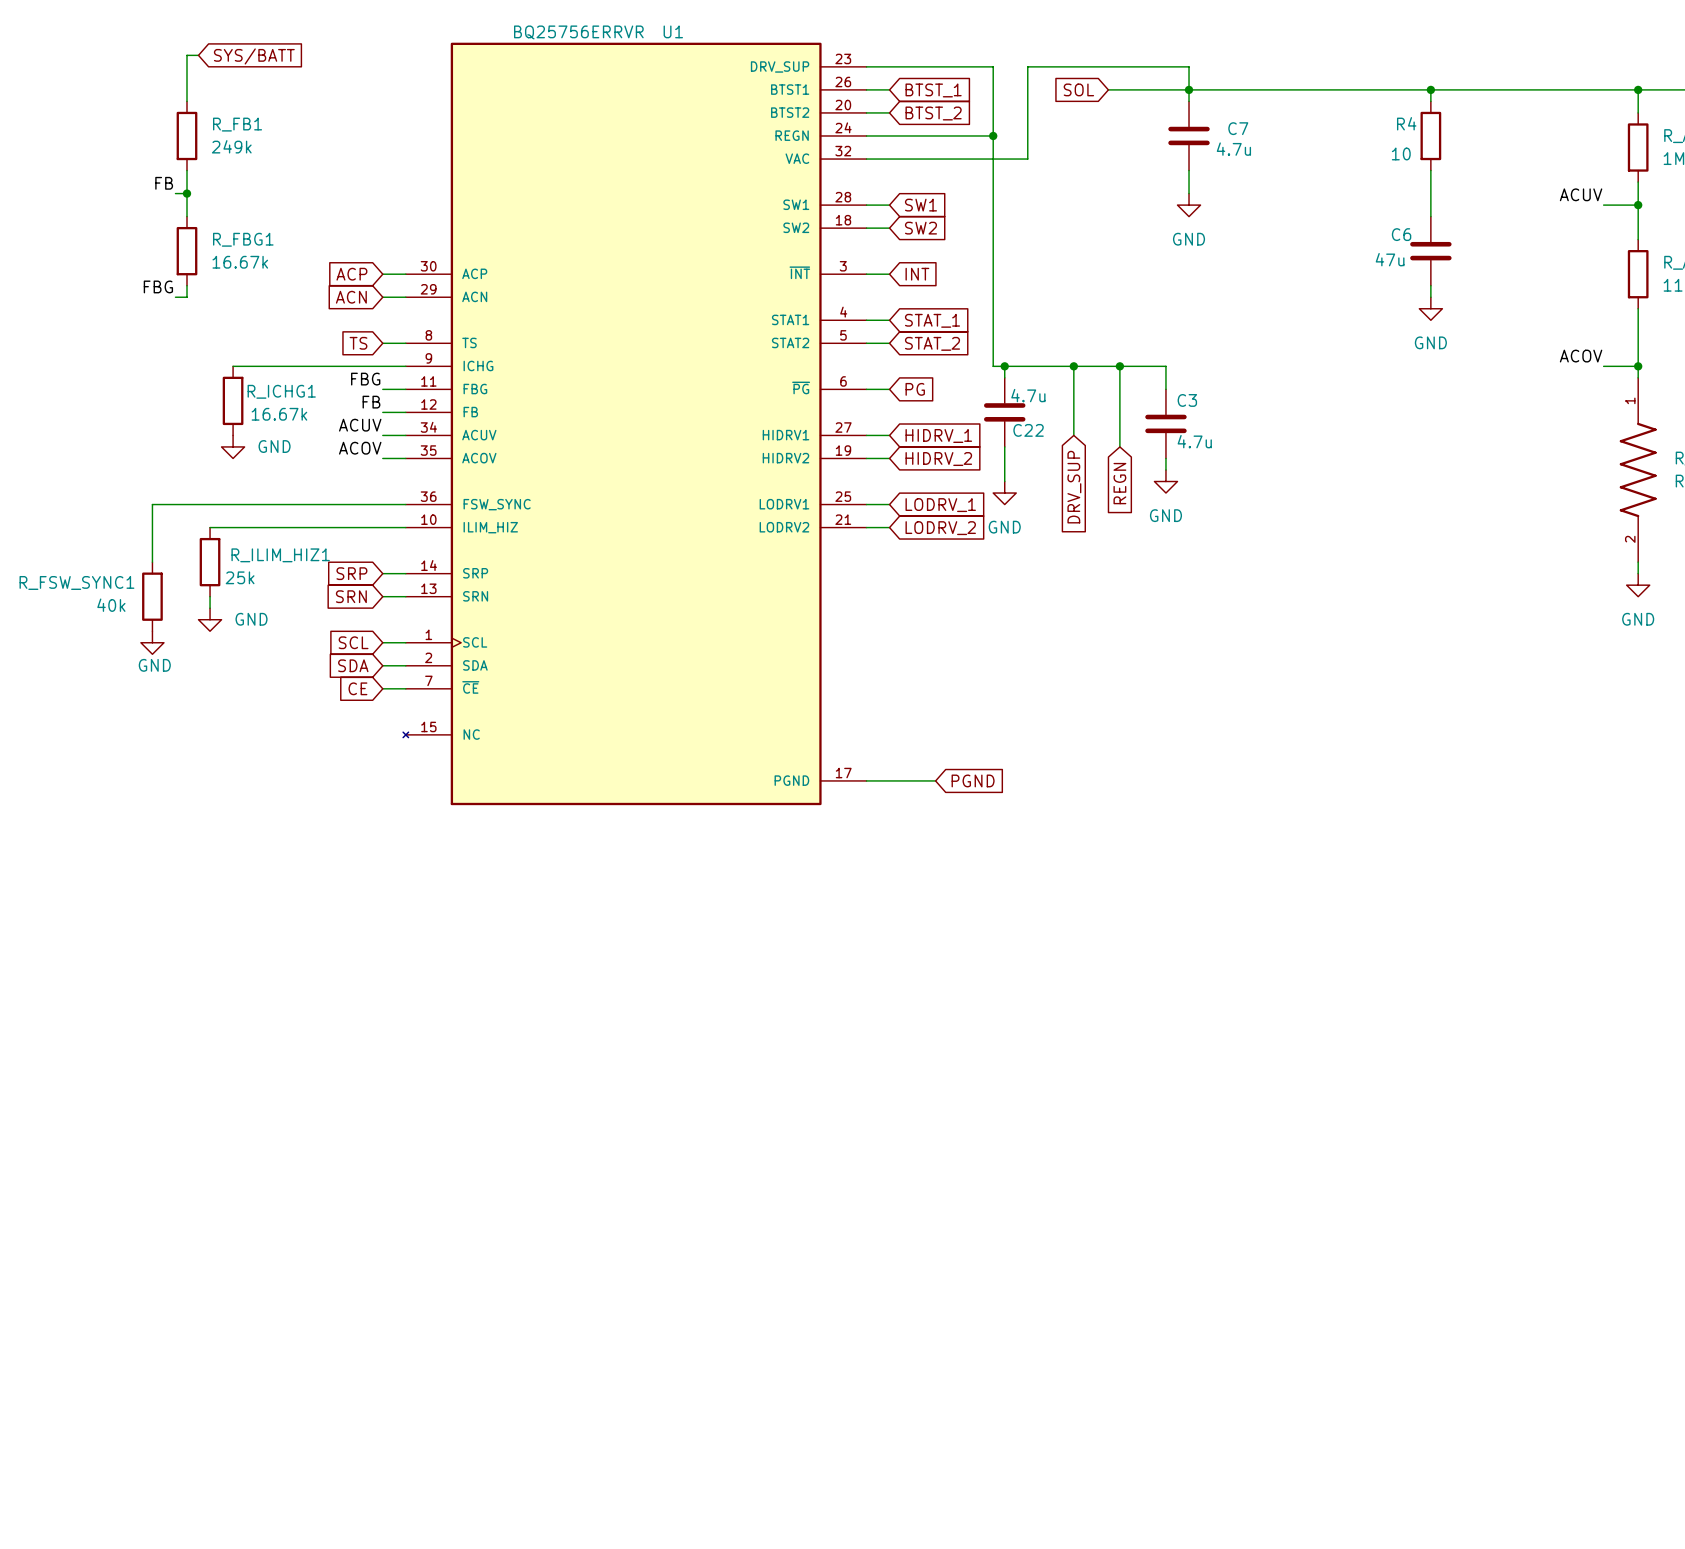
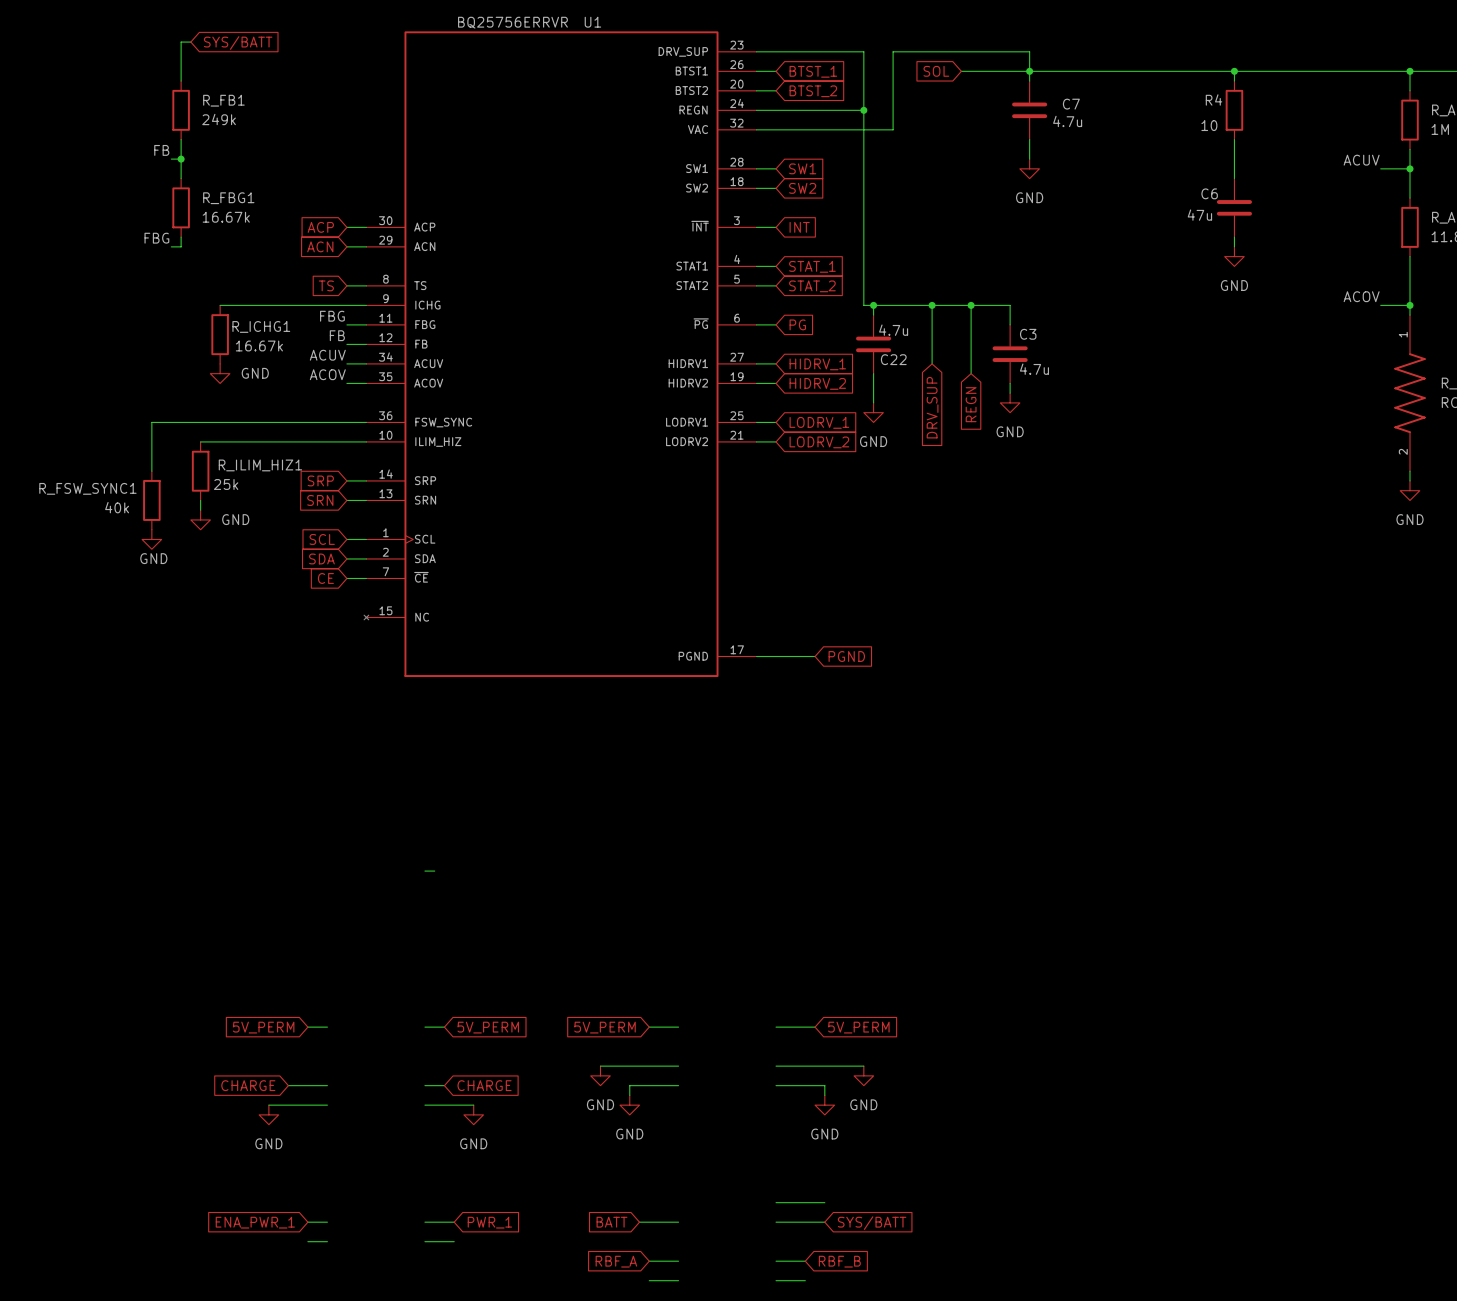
wire: none -> (424, 871) (434, 871)
wire: none -> (307, 1027) (327, 1027)
wire: none -> (424, 1027) (444, 1027)
wire: none -> (649, 1027) (678, 1027)
wire: none -> (776, 1027) (815, 1027)
global label: none -> 5V_PERM (263, 1027)
global label: none -> 5V_PERM (488, 1027)
global label: none -> 5V_PERM (605, 1027)
global label: none -> 5V_PERM (858, 1027)
wire: none -> (600, 1066) (678, 1066)
wire: none -> (776, 1066) (863, 1066)
power symbol: none -> GND (600, 1075)
power symbol: none -> GND (863, 1075)
global label: none -> CHARGE (248, 1085)
wire: none -> (288, 1085) (327, 1085)
wire: none -> (424, 1085) (444, 1085)
global label: none -> CHARGE (484, 1085)
wire: none -> (678, 1085) (629, 1085) (629, 1095)
wire: none -> (776, 1085) (824, 1085) (824, 1095)
wire: none -> (268, 1105) (327, 1105)
wire: none -> (424, 1105) (473, 1105)
power symbol: none -> GND (629, 1105)
power symbol: none -> GND (824, 1105)
power symbol: none -> GND (268, 1114)
power symbol: none -> GND (473, 1114)
wire: none -> (776, 1202) (824, 1202)
wire: none -> (307, 1222) (327, 1222)
wire: none -> (424, 1222) (454, 1222)
global label: none -> BATT (611, 1222)
wire: none -> (639, 1222) (678, 1222)
wire: none -> (776, 1222) (824, 1222)
global label: none -> ENA_PWR_1 (255, 1222)
global label: none -> PWR_1 (489, 1222)
global label: none -> SYS/BATT (872, 1223)
wire: none -> (307, 1241) (327, 1241)
wire: none -> (424, 1241) (454, 1241)
global label: none -> RBF_A (616, 1261)
wire: none -> (649, 1261) (678, 1261)
wire: none -> (776, 1261) (805, 1261)
global label: none -> RBF_B (839, 1261)
wire: none -> (649, 1280) (678, 1280)
wire: none -> (776, 1280) (805, 1280)

